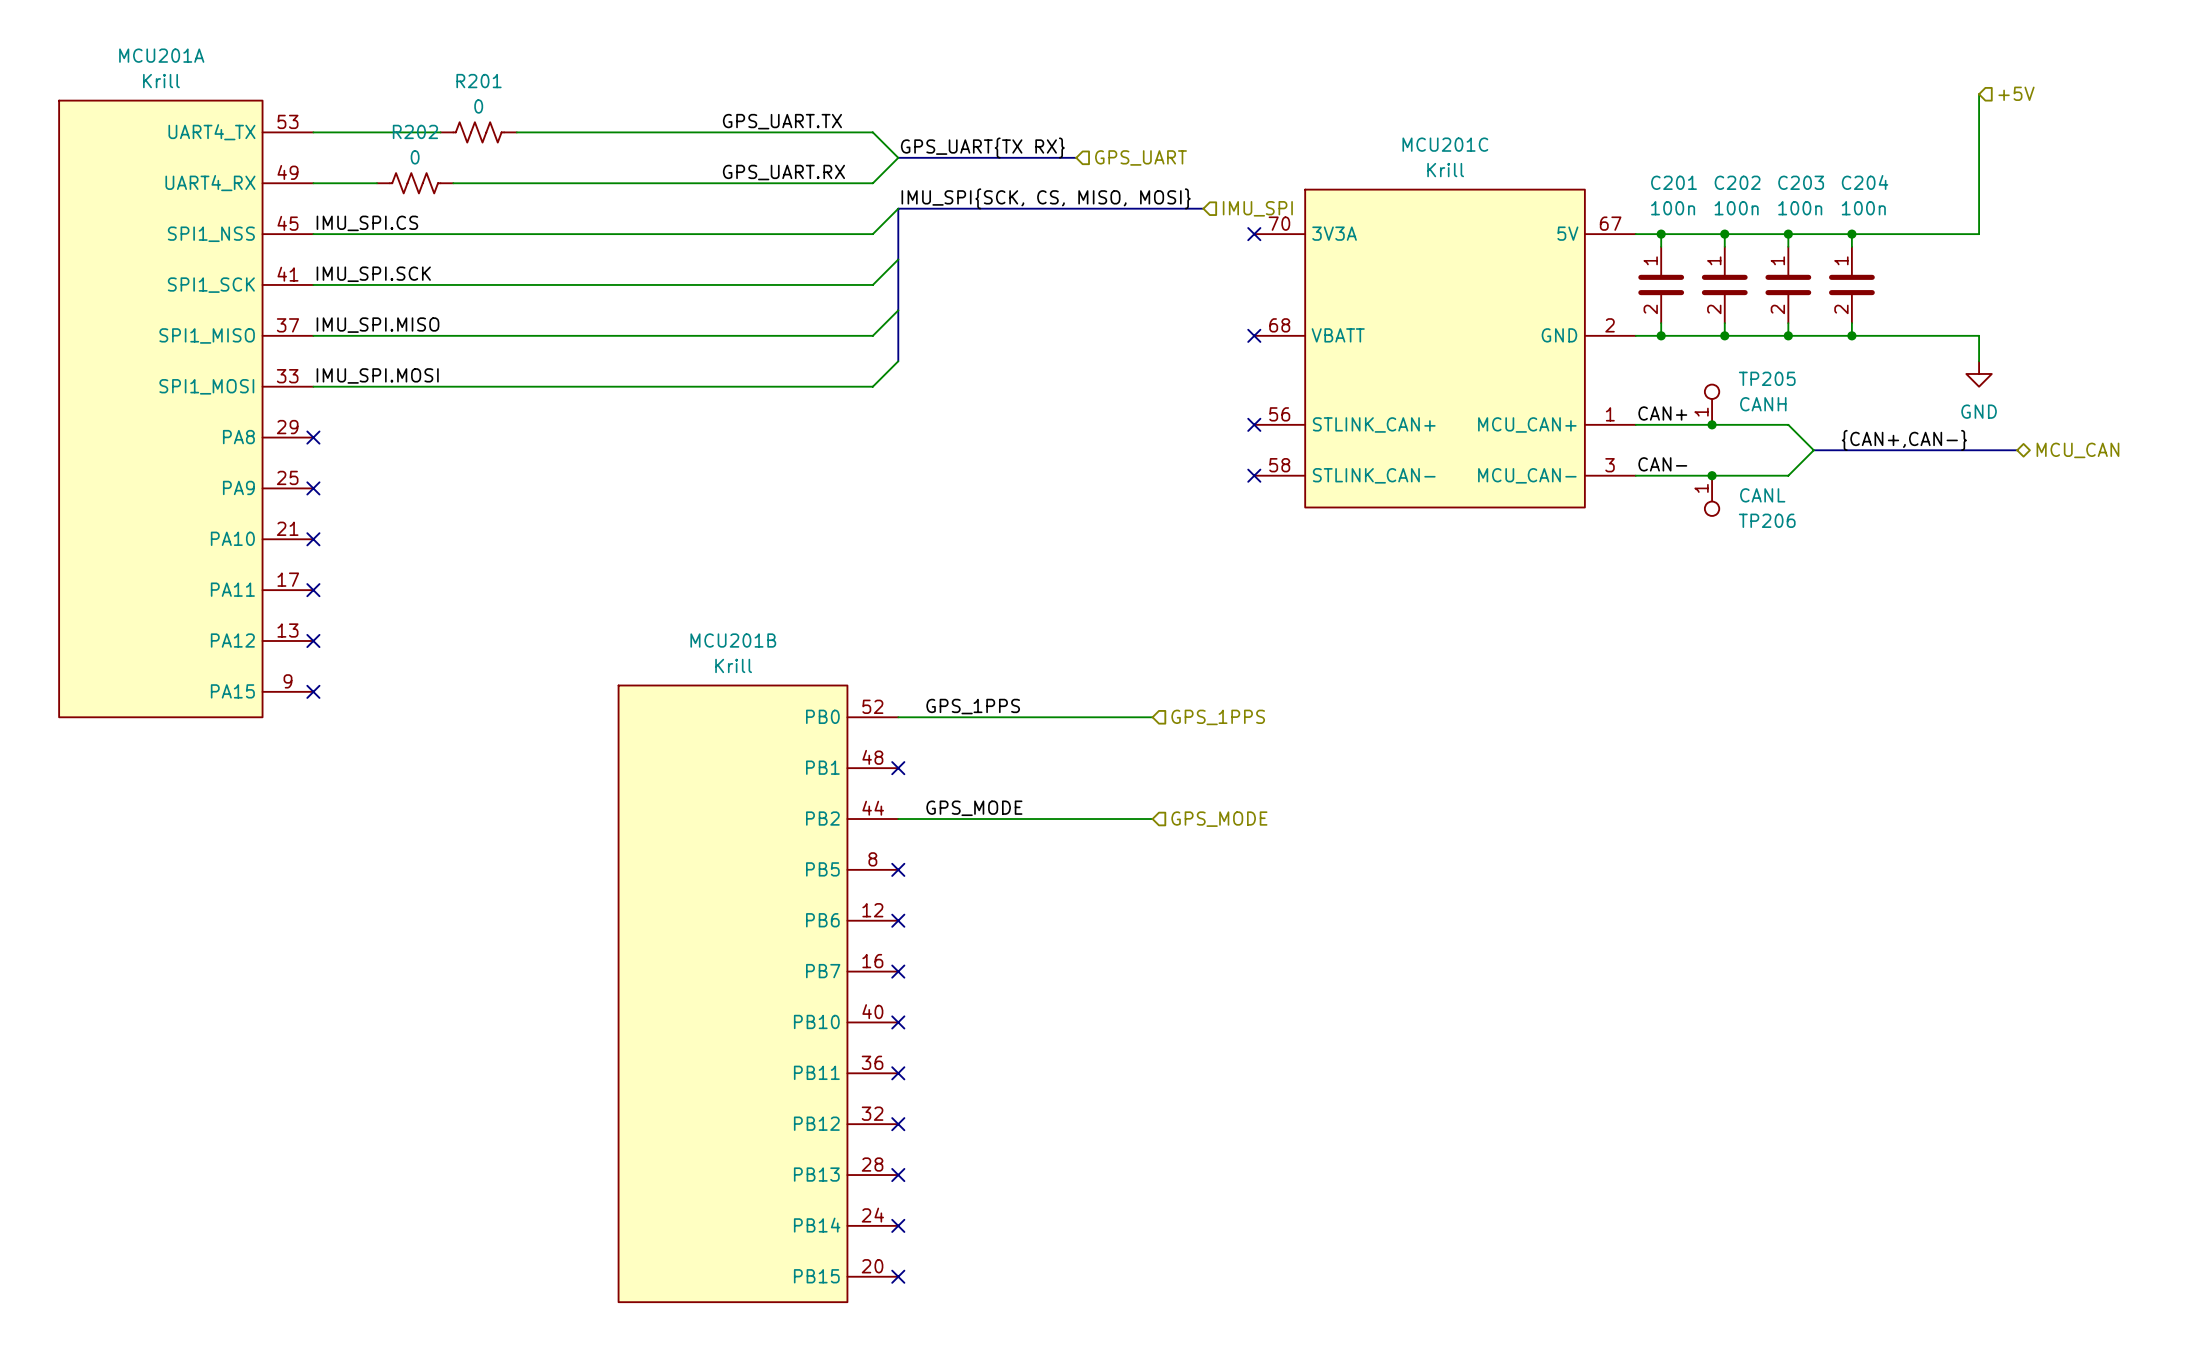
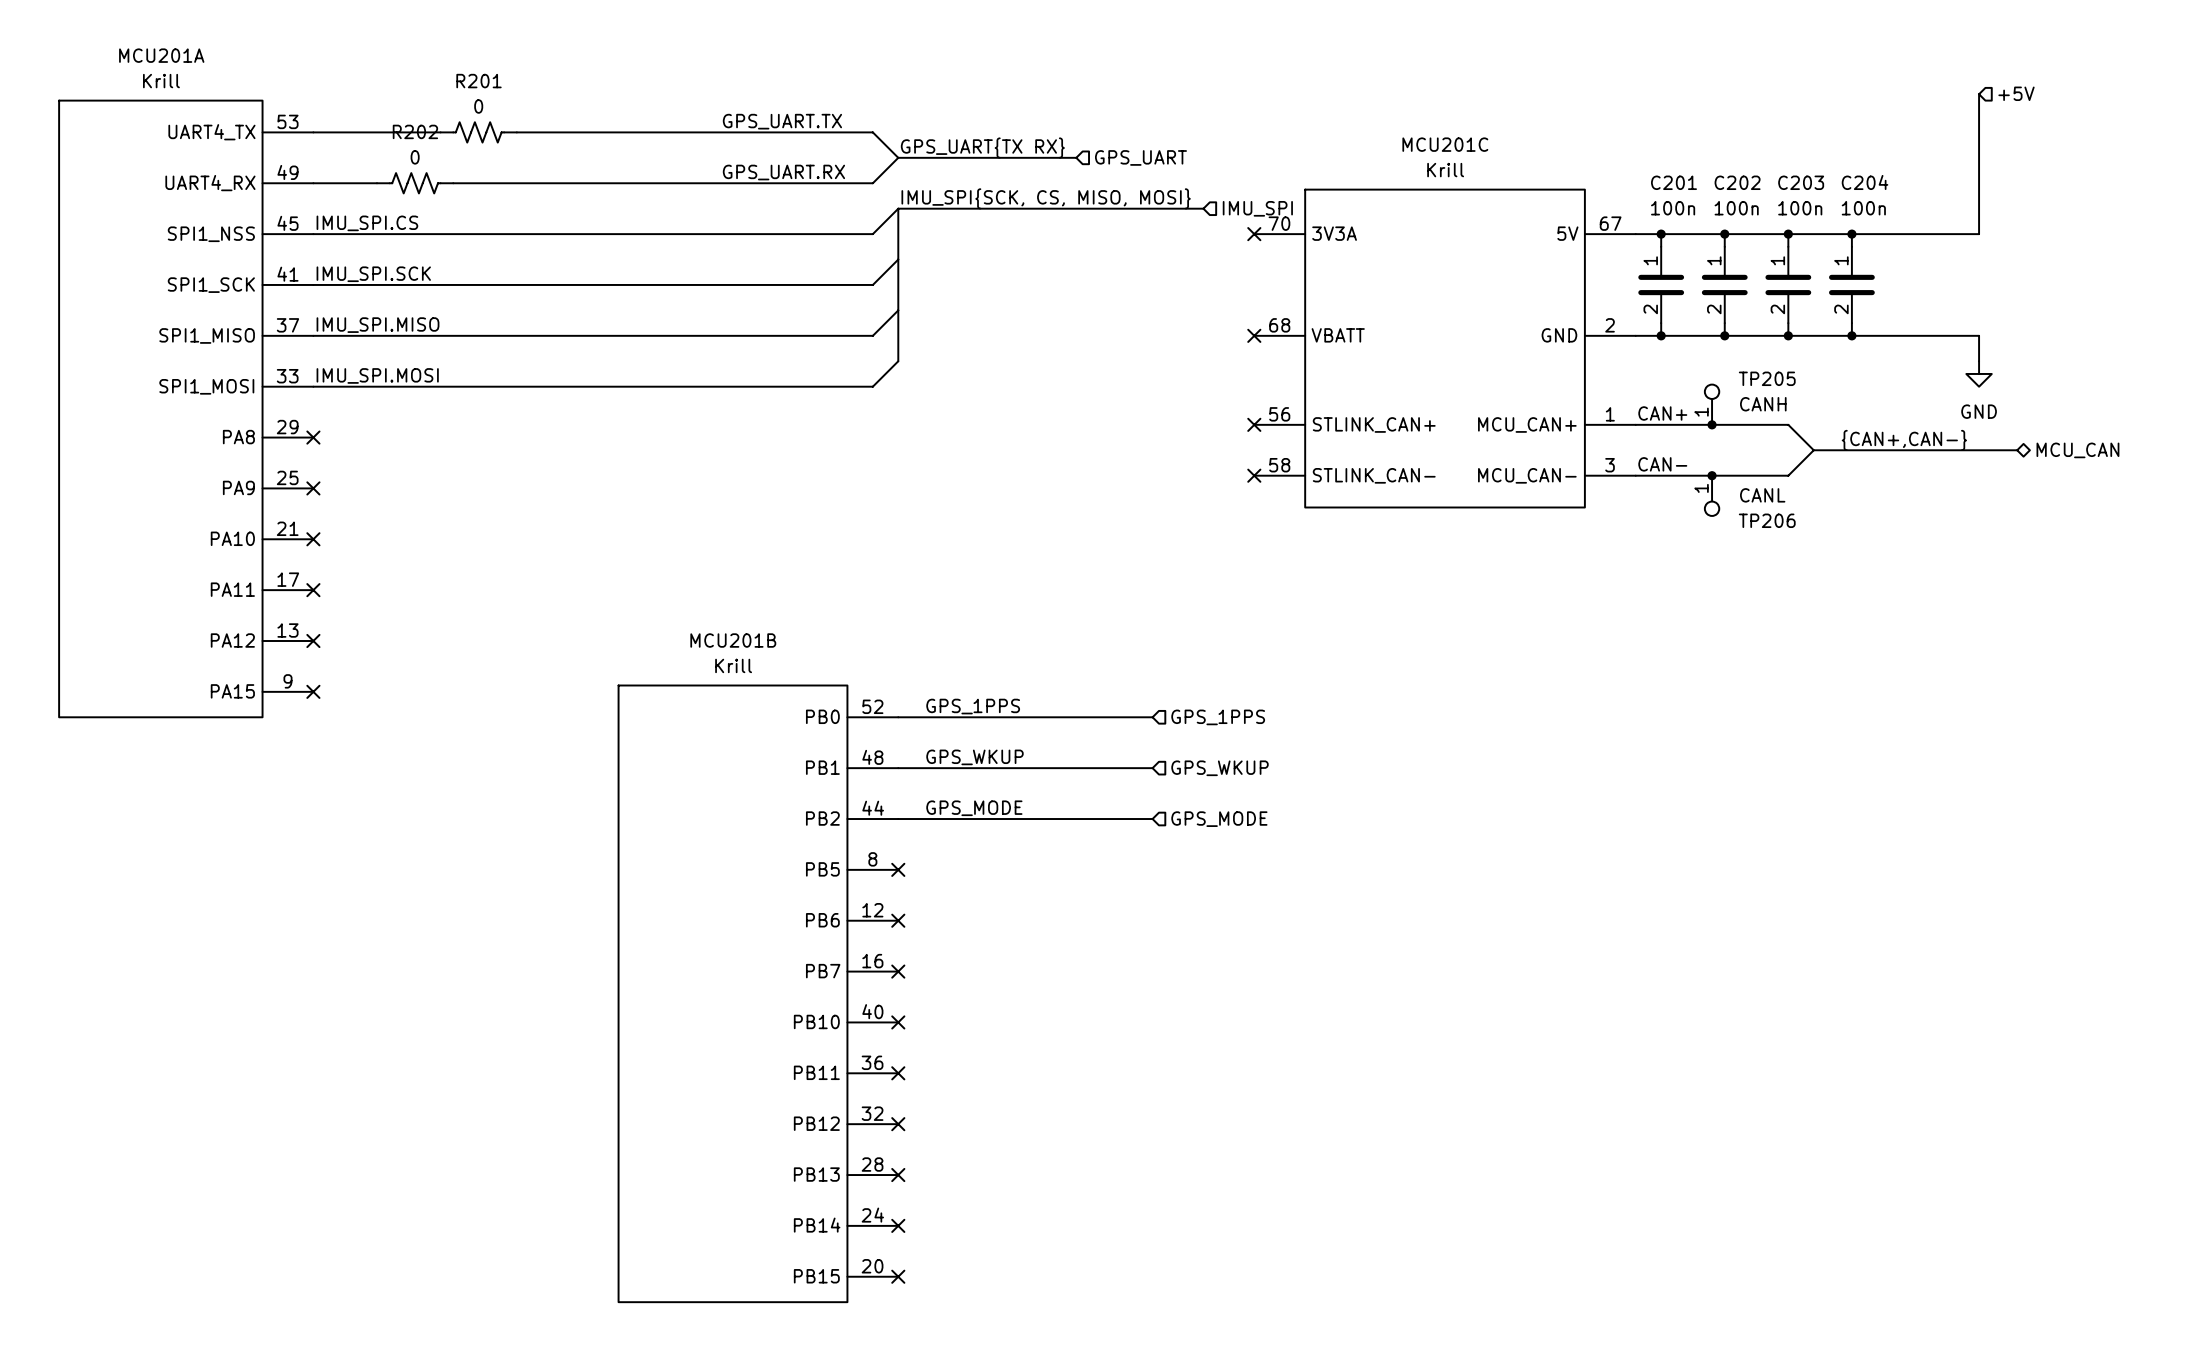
label: none -> GPS_WKUP (974, 757)
wire: none -> (898, 768) (1152, 768)
no-connect mark: (898, 768) -> none
hierarchical label: none -> GPS_WKUP (1220, 768)

